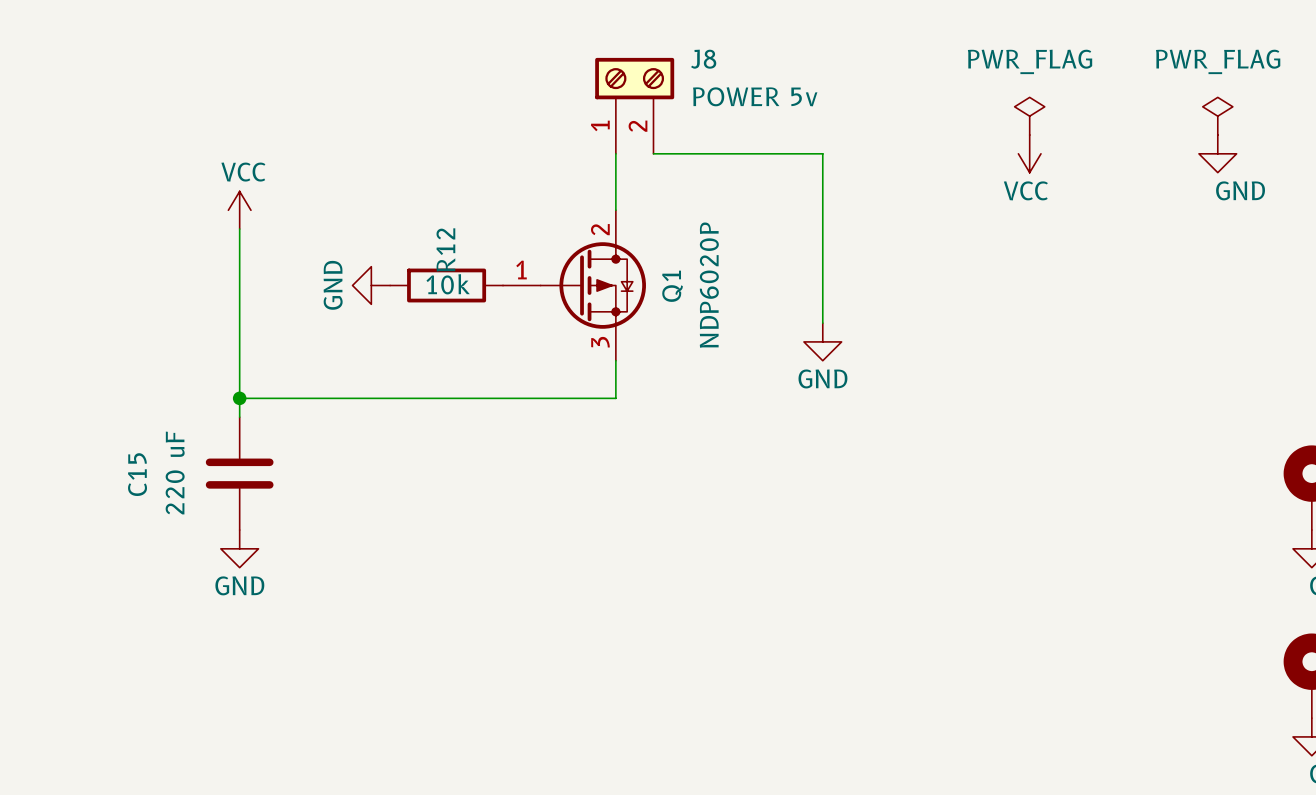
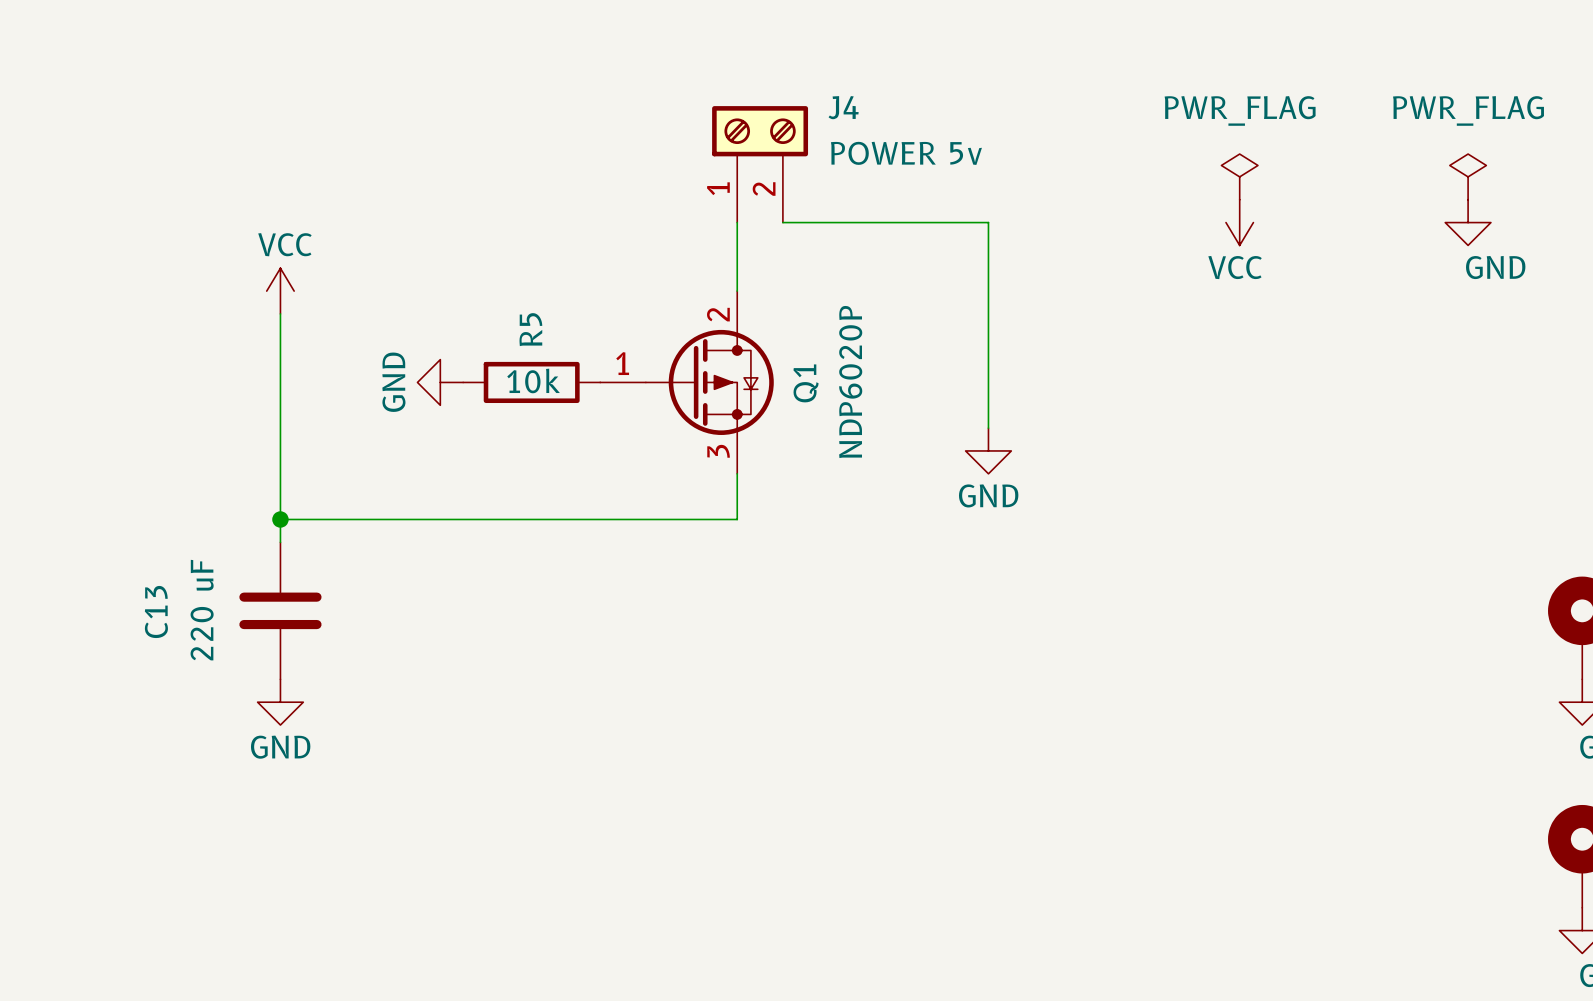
J8 name: J8 (703, 59) -> J4 (843, 107)
R12 name: R12 (445, 249) -> R5 (530, 329)
C15 name: C15 (137, 474) -> C13 (156, 611)

